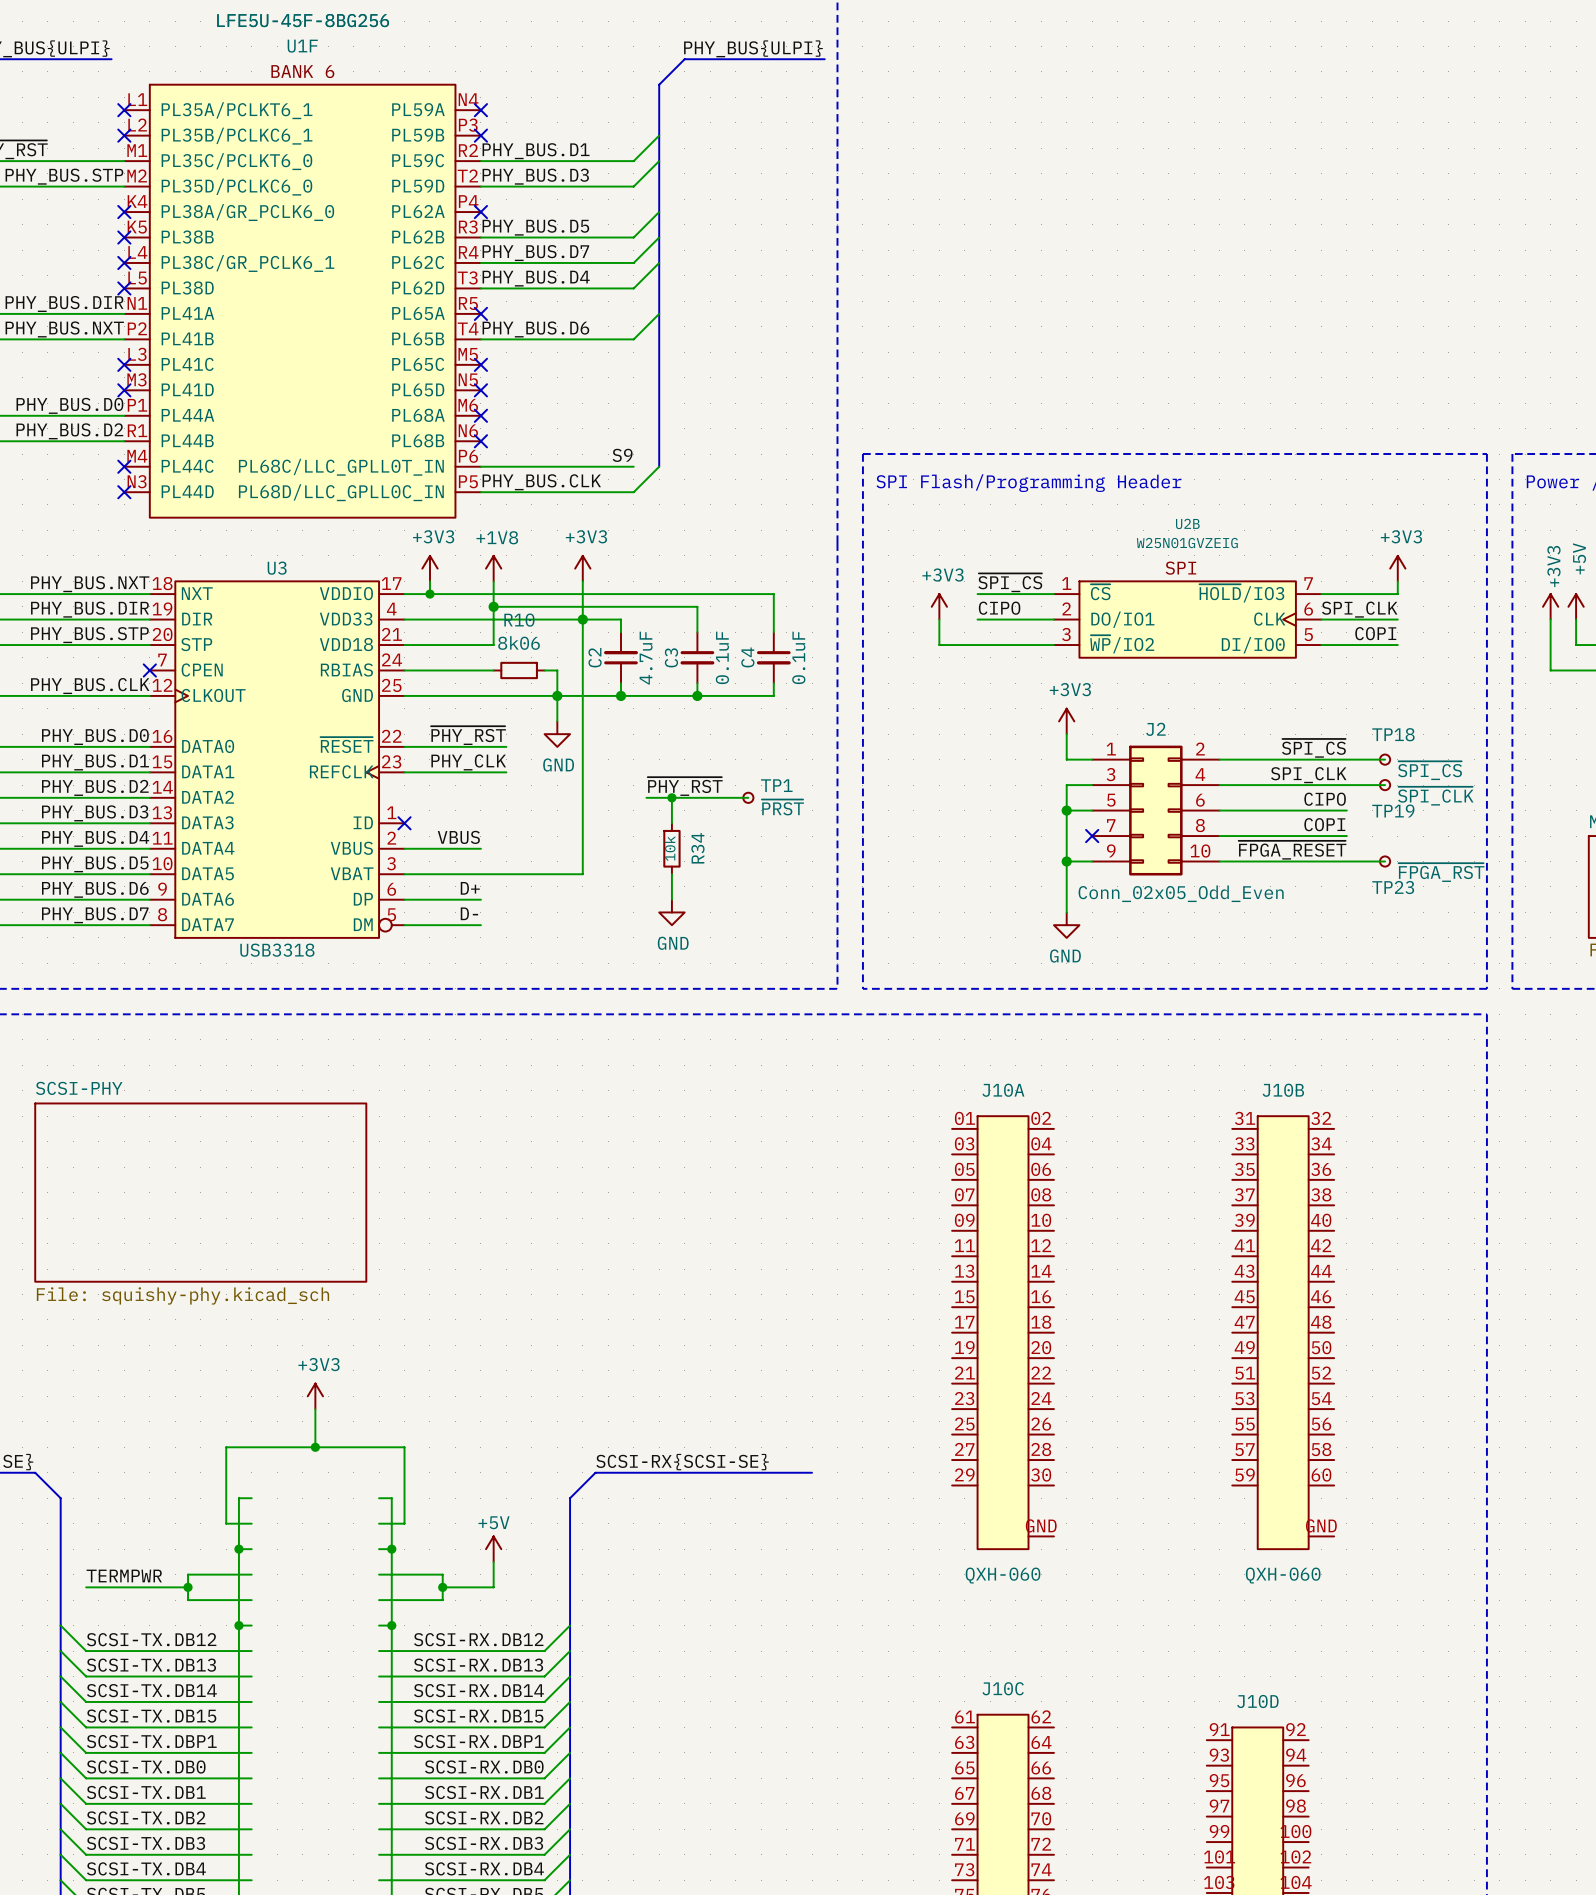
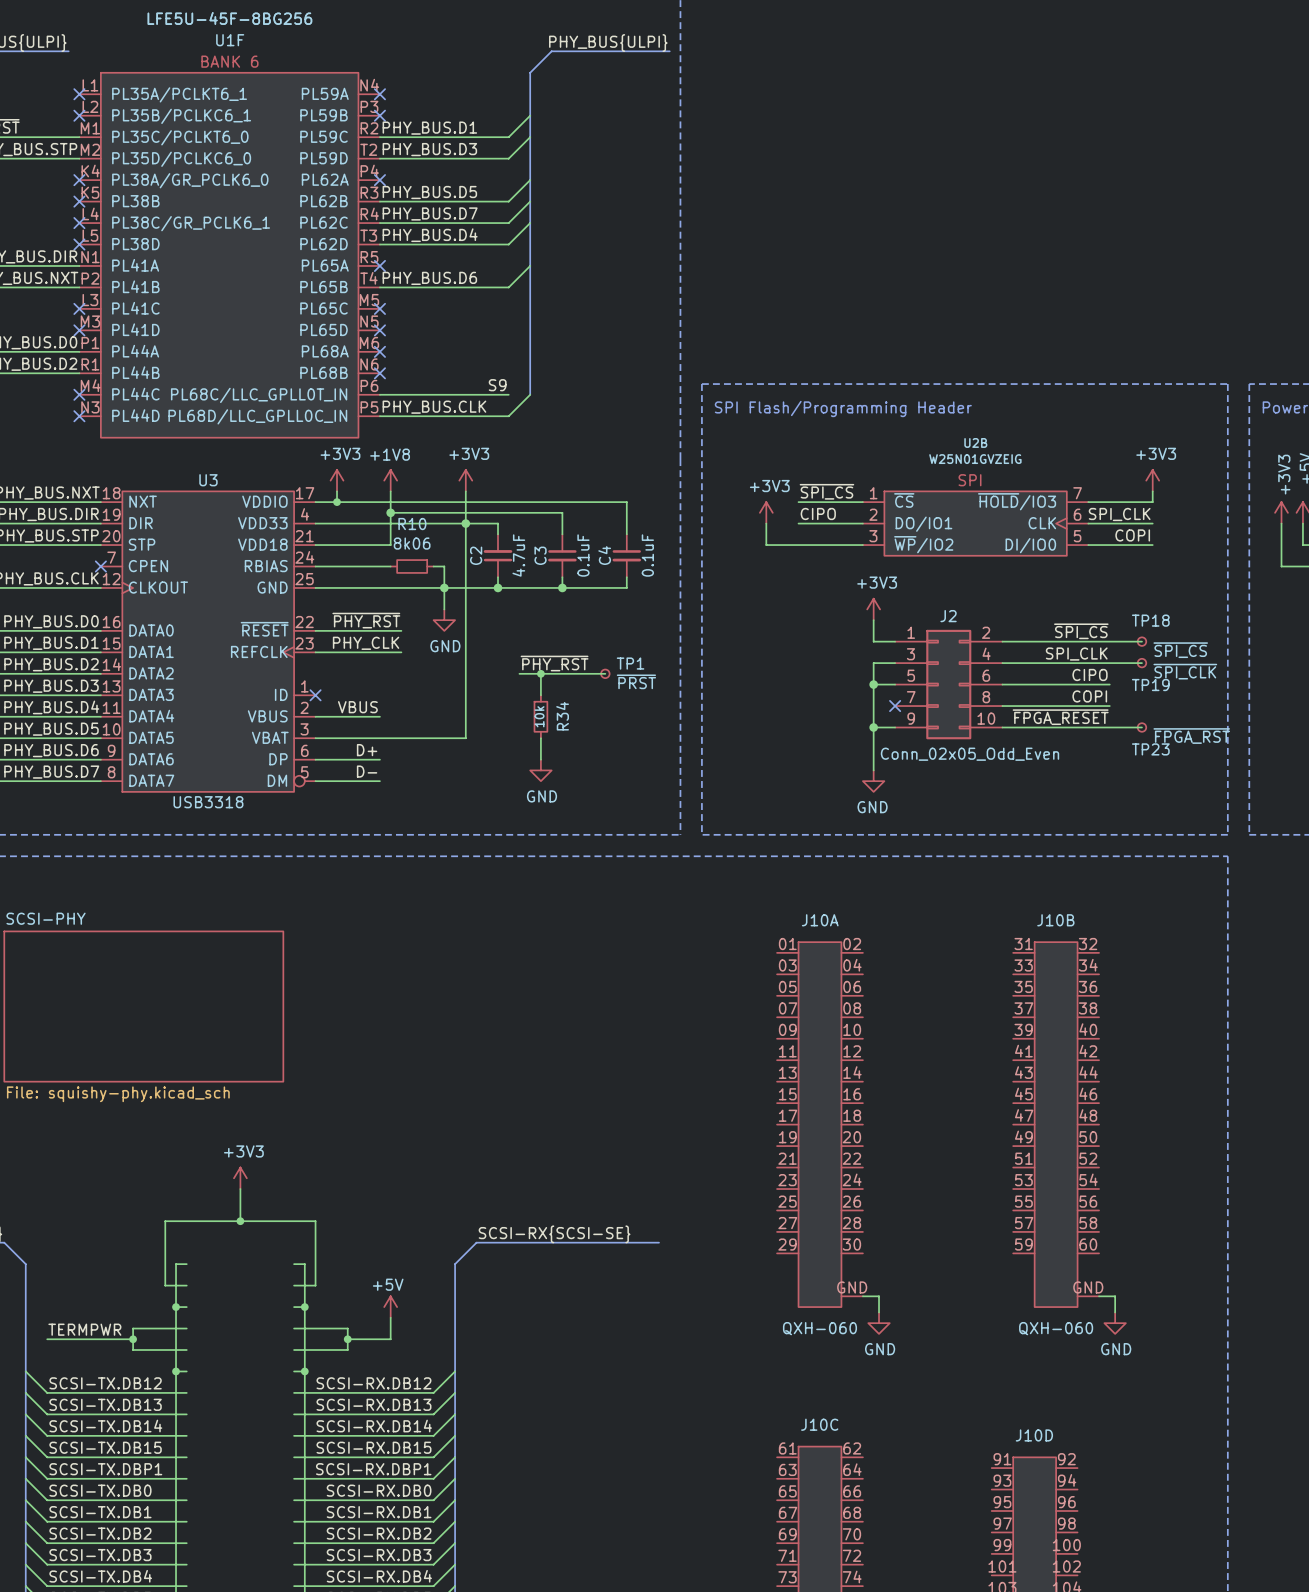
wire: none -> (862, 1296) (879, 1296) (879, 1312)
wire: none -> (1099, 1296) (1115, 1296) (1115, 1312)
power symbol: none -> GND (879, 1323)
power symbol: none -> GND (1115, 1323)

